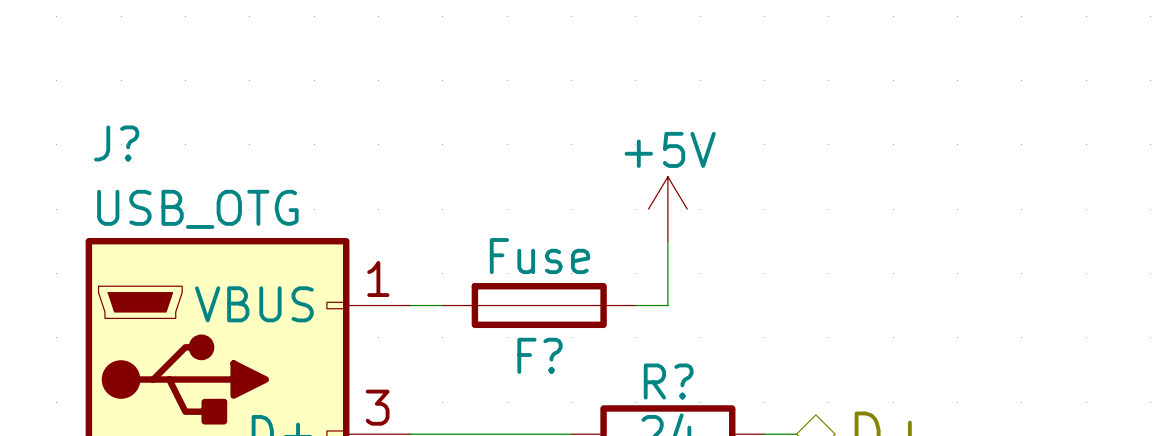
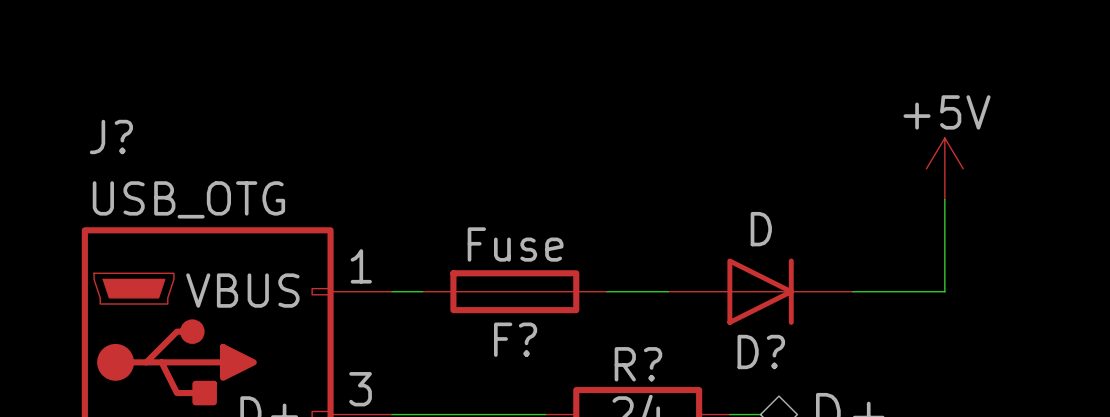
power symbol position: +5V (667, 209) -> +5V (944, 168)
wire: none -> (944, 199) (944, 291) (852, 291)
wire: (667, 241) (667, 305) -> (668, 291) (637, 291)
D?: none -> D (760, 291)

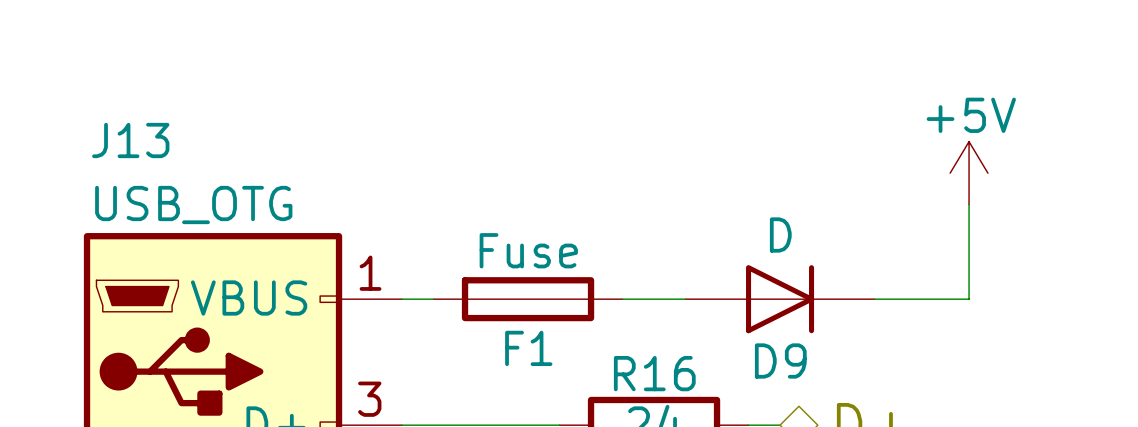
J? name: J? (111, 136) -> J13 (130, 140)
F? name: F? (515, 339) -> F1 (528, 348)
D? name: D? (761, 351) -> D9 (780, 361)
R? name: R? (638, 364) -> R16 (654, 373)

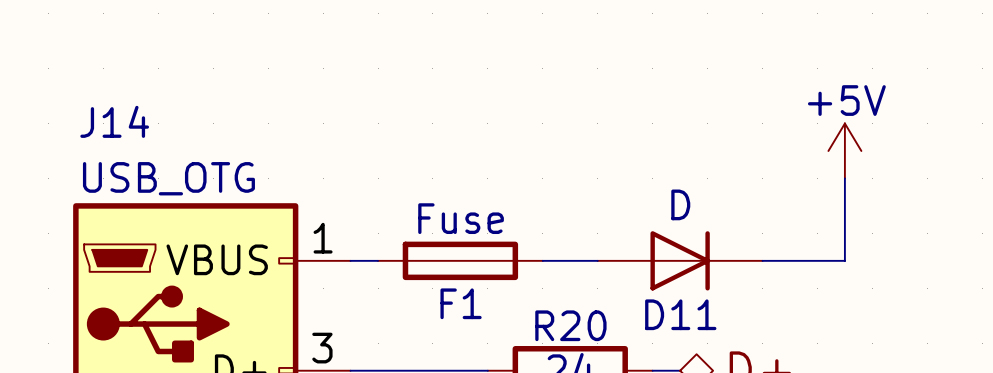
J13 name: J13 (130, 140) -> J14 (114, 121)
D9 name: D9 (780, 361) -> D11 (680, 314)
R16 name: R16 (654, 373) -> R20 (570, 325)

